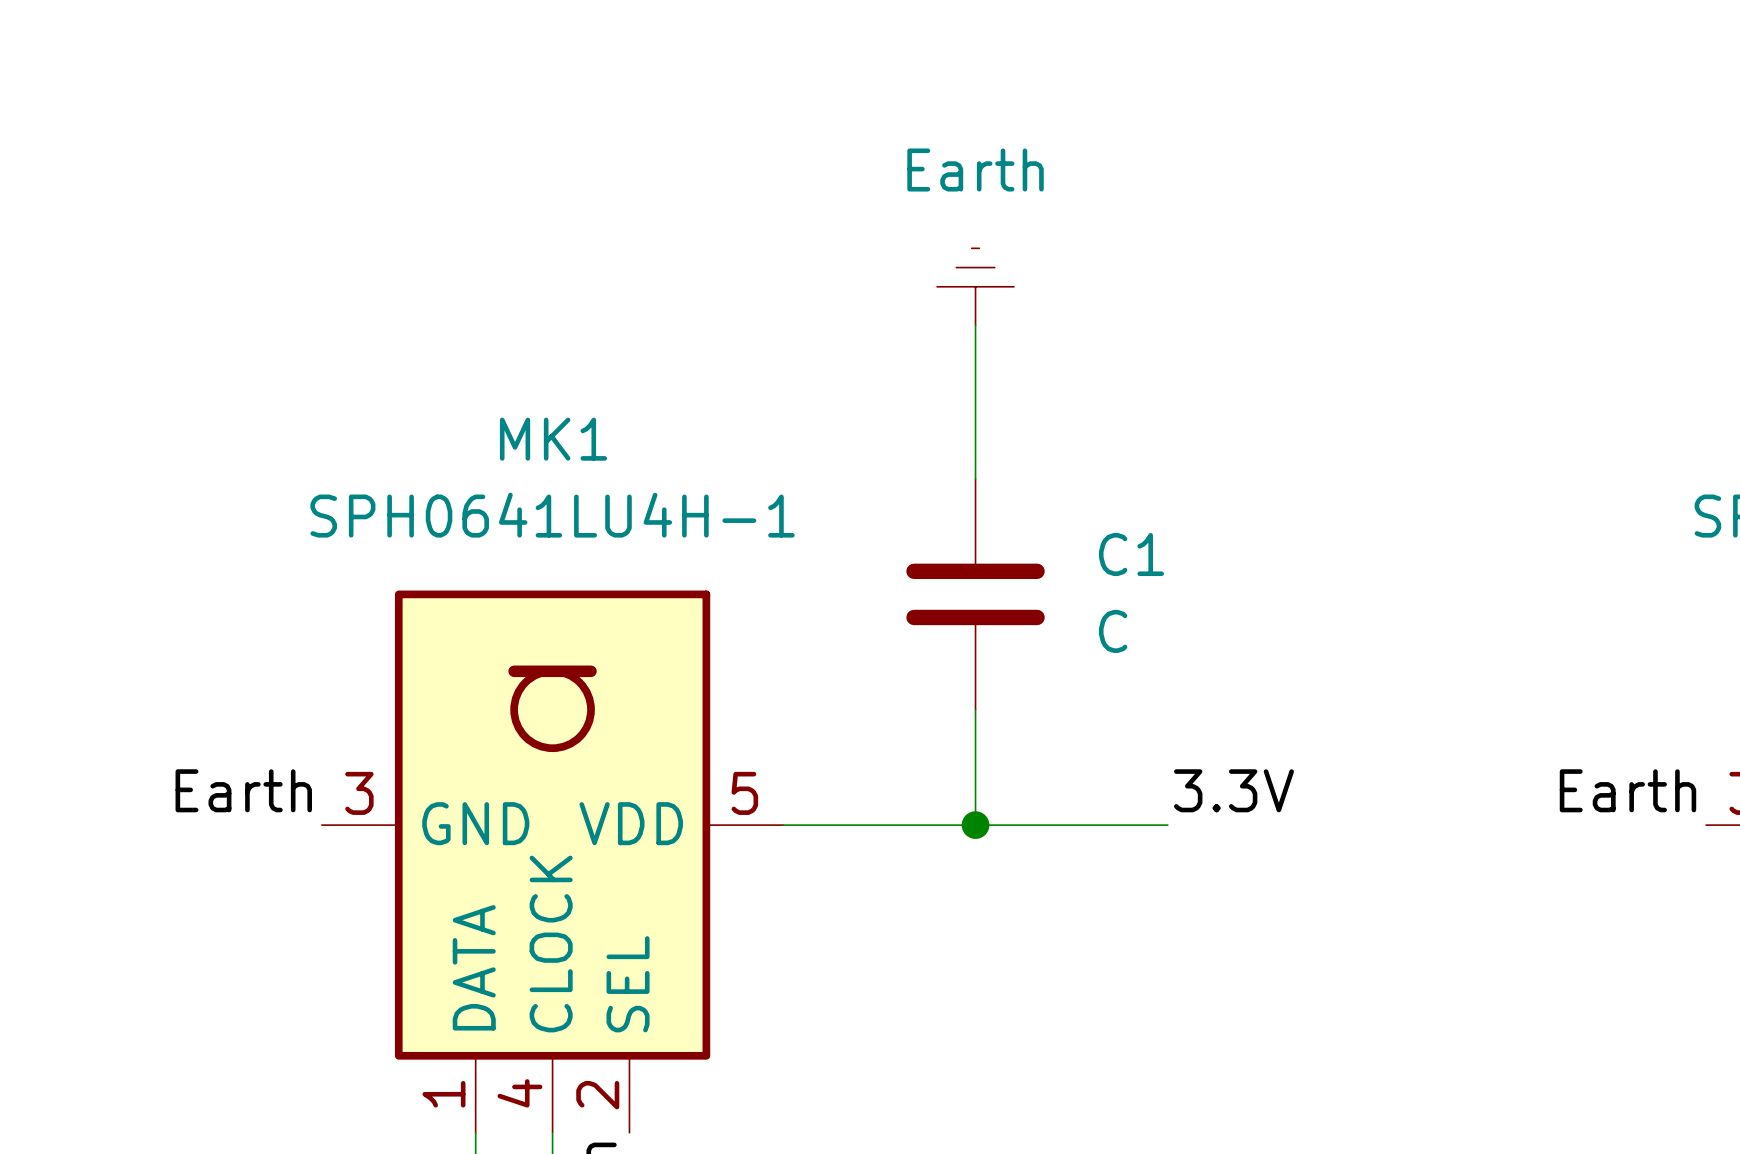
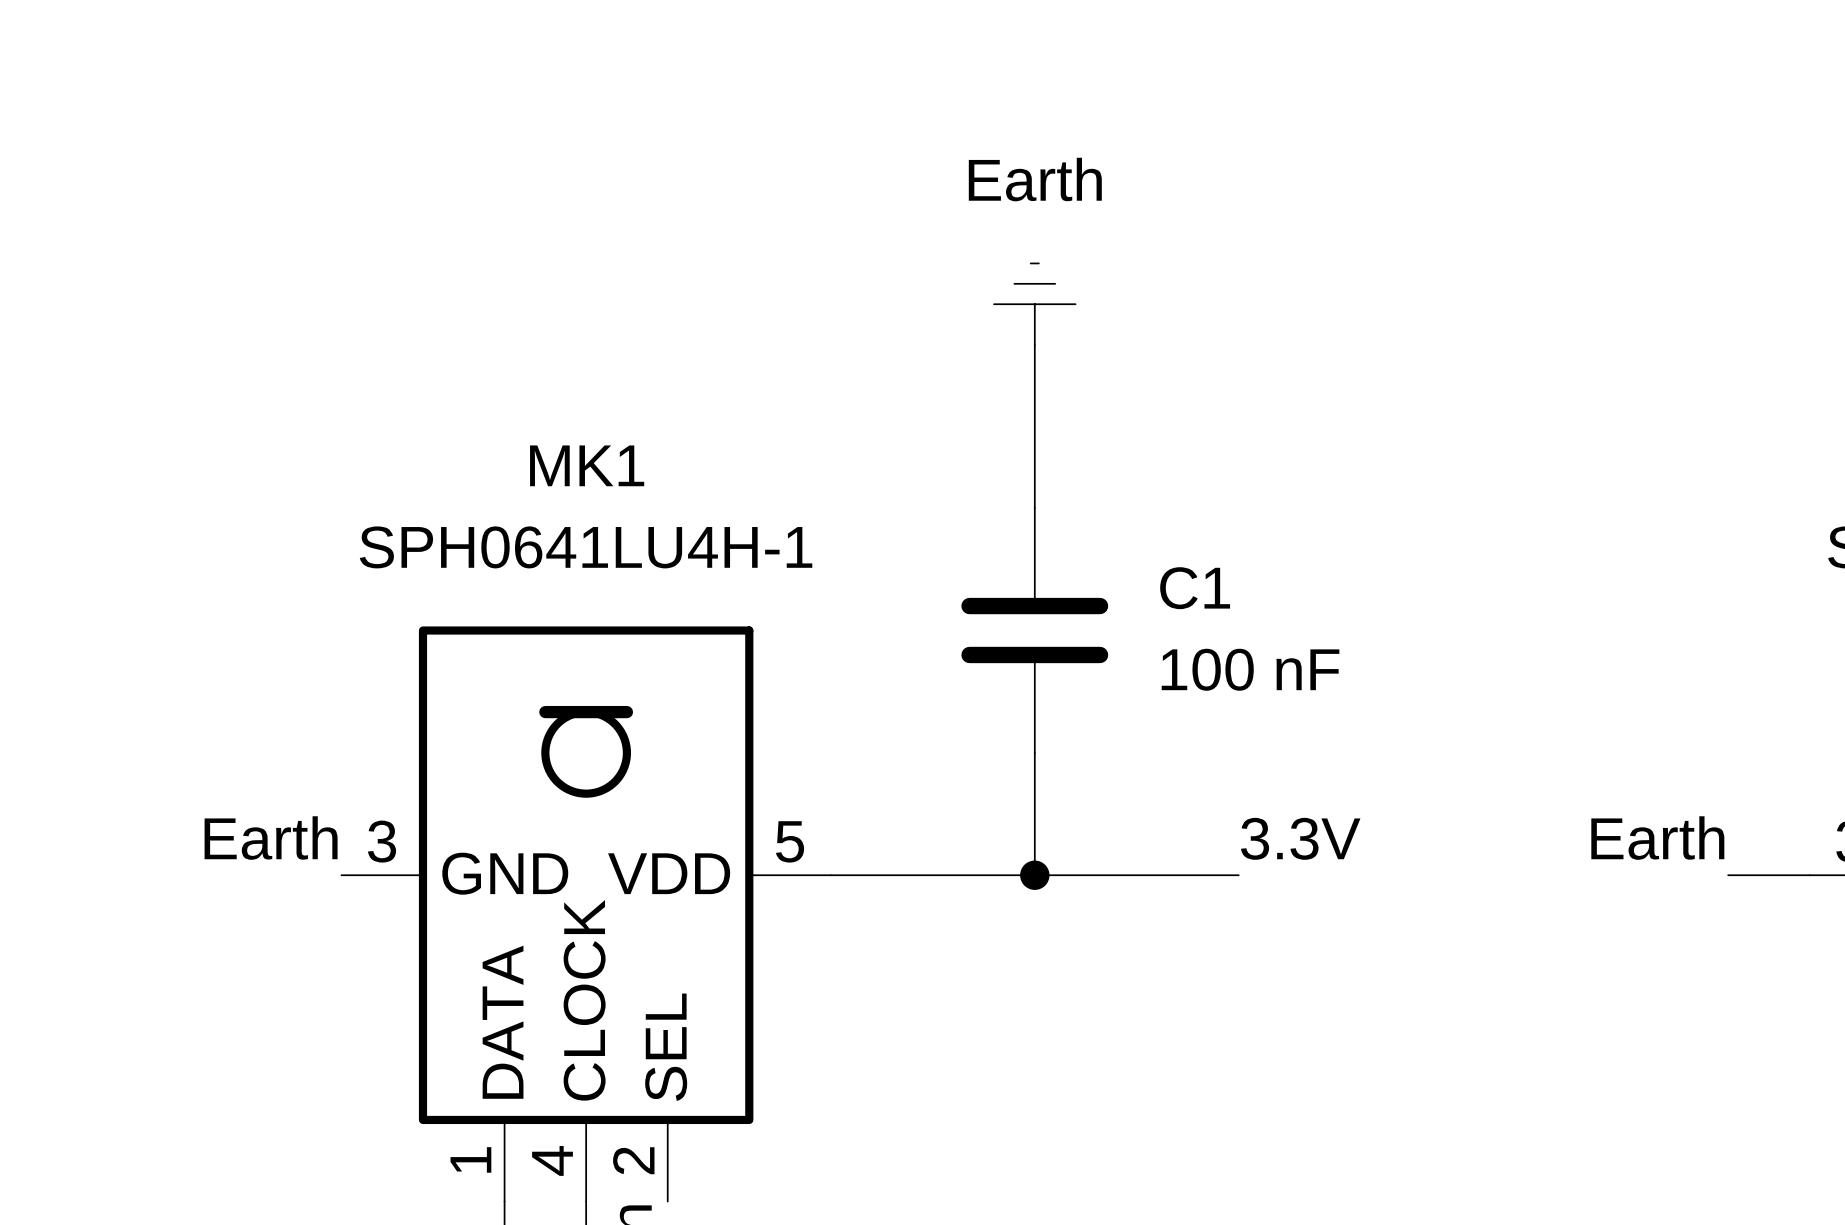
C1 value: C (1113, 631) -> 100 nF (1250, 669)
label position: Earth (1627, 790) -> Earth (1657, 838)
wire: none -> (1728, 875) (1809, 875)

